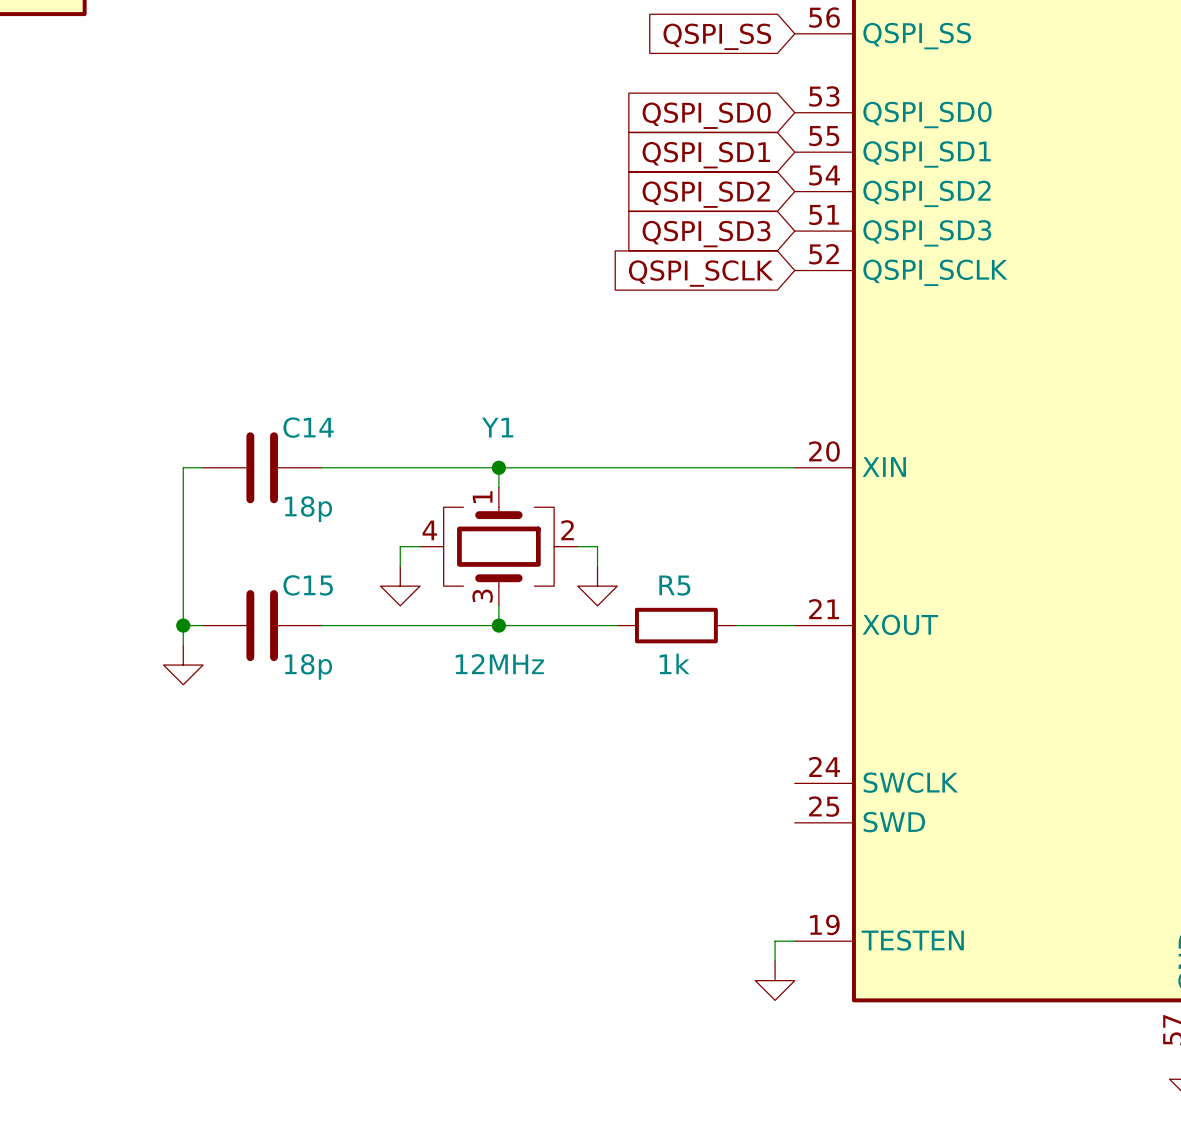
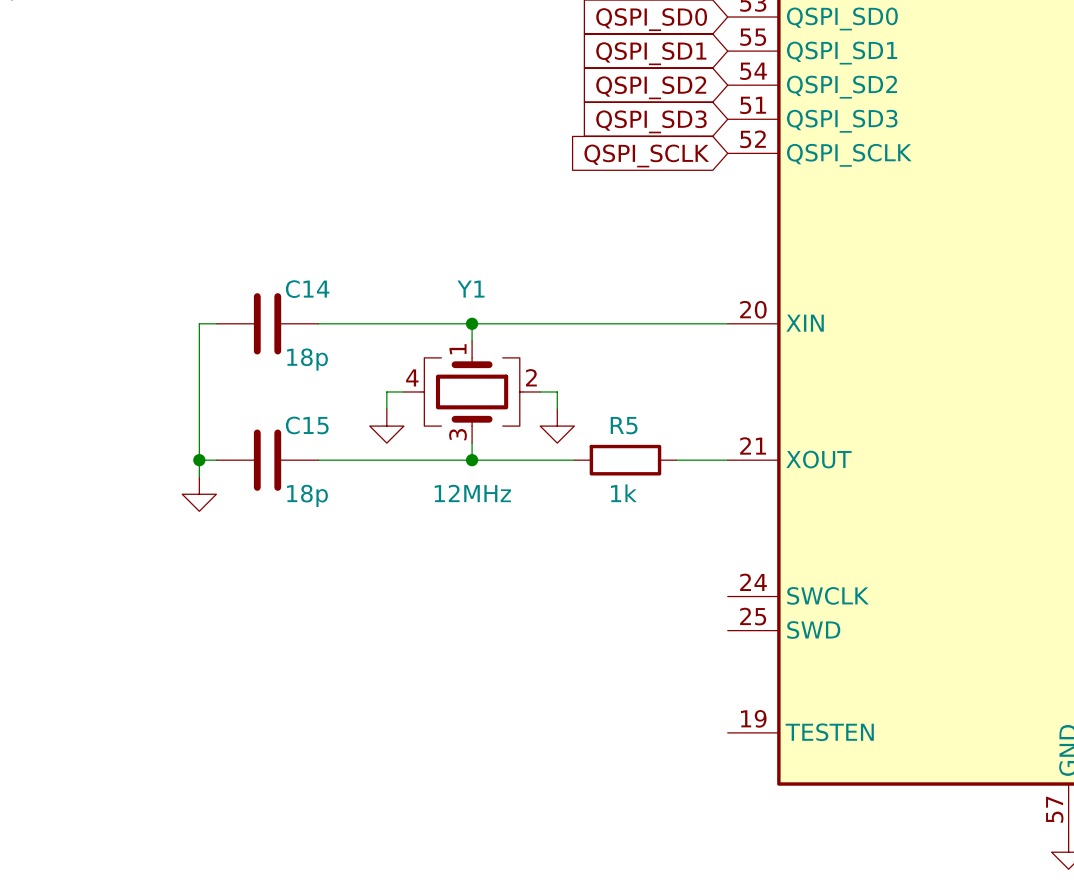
wire: (794, 941) (775, 941) (775, 960) -> none
power symbol: (775, 980) -> none

